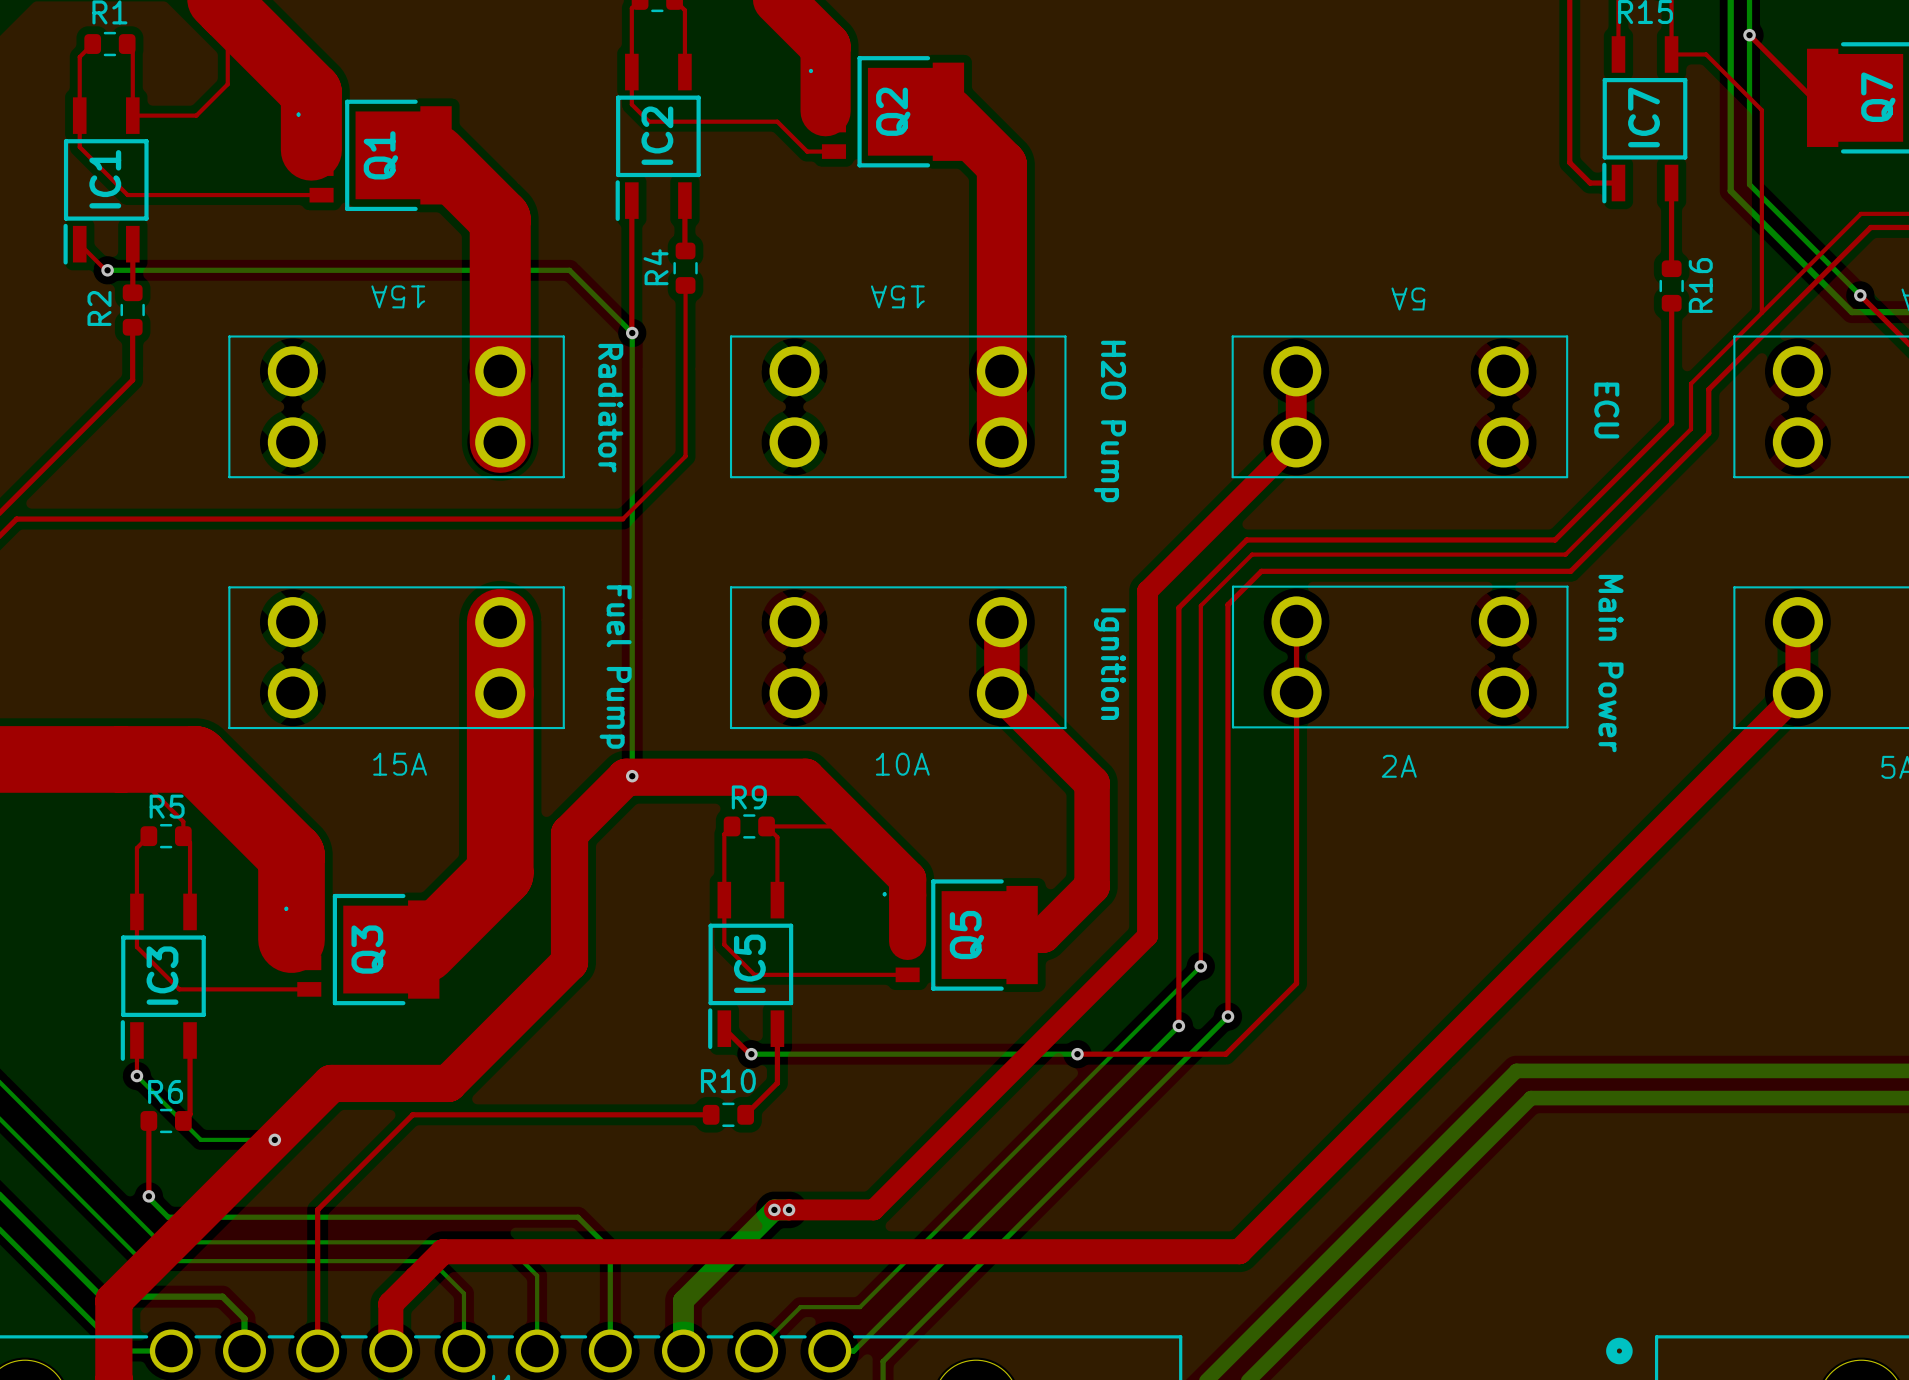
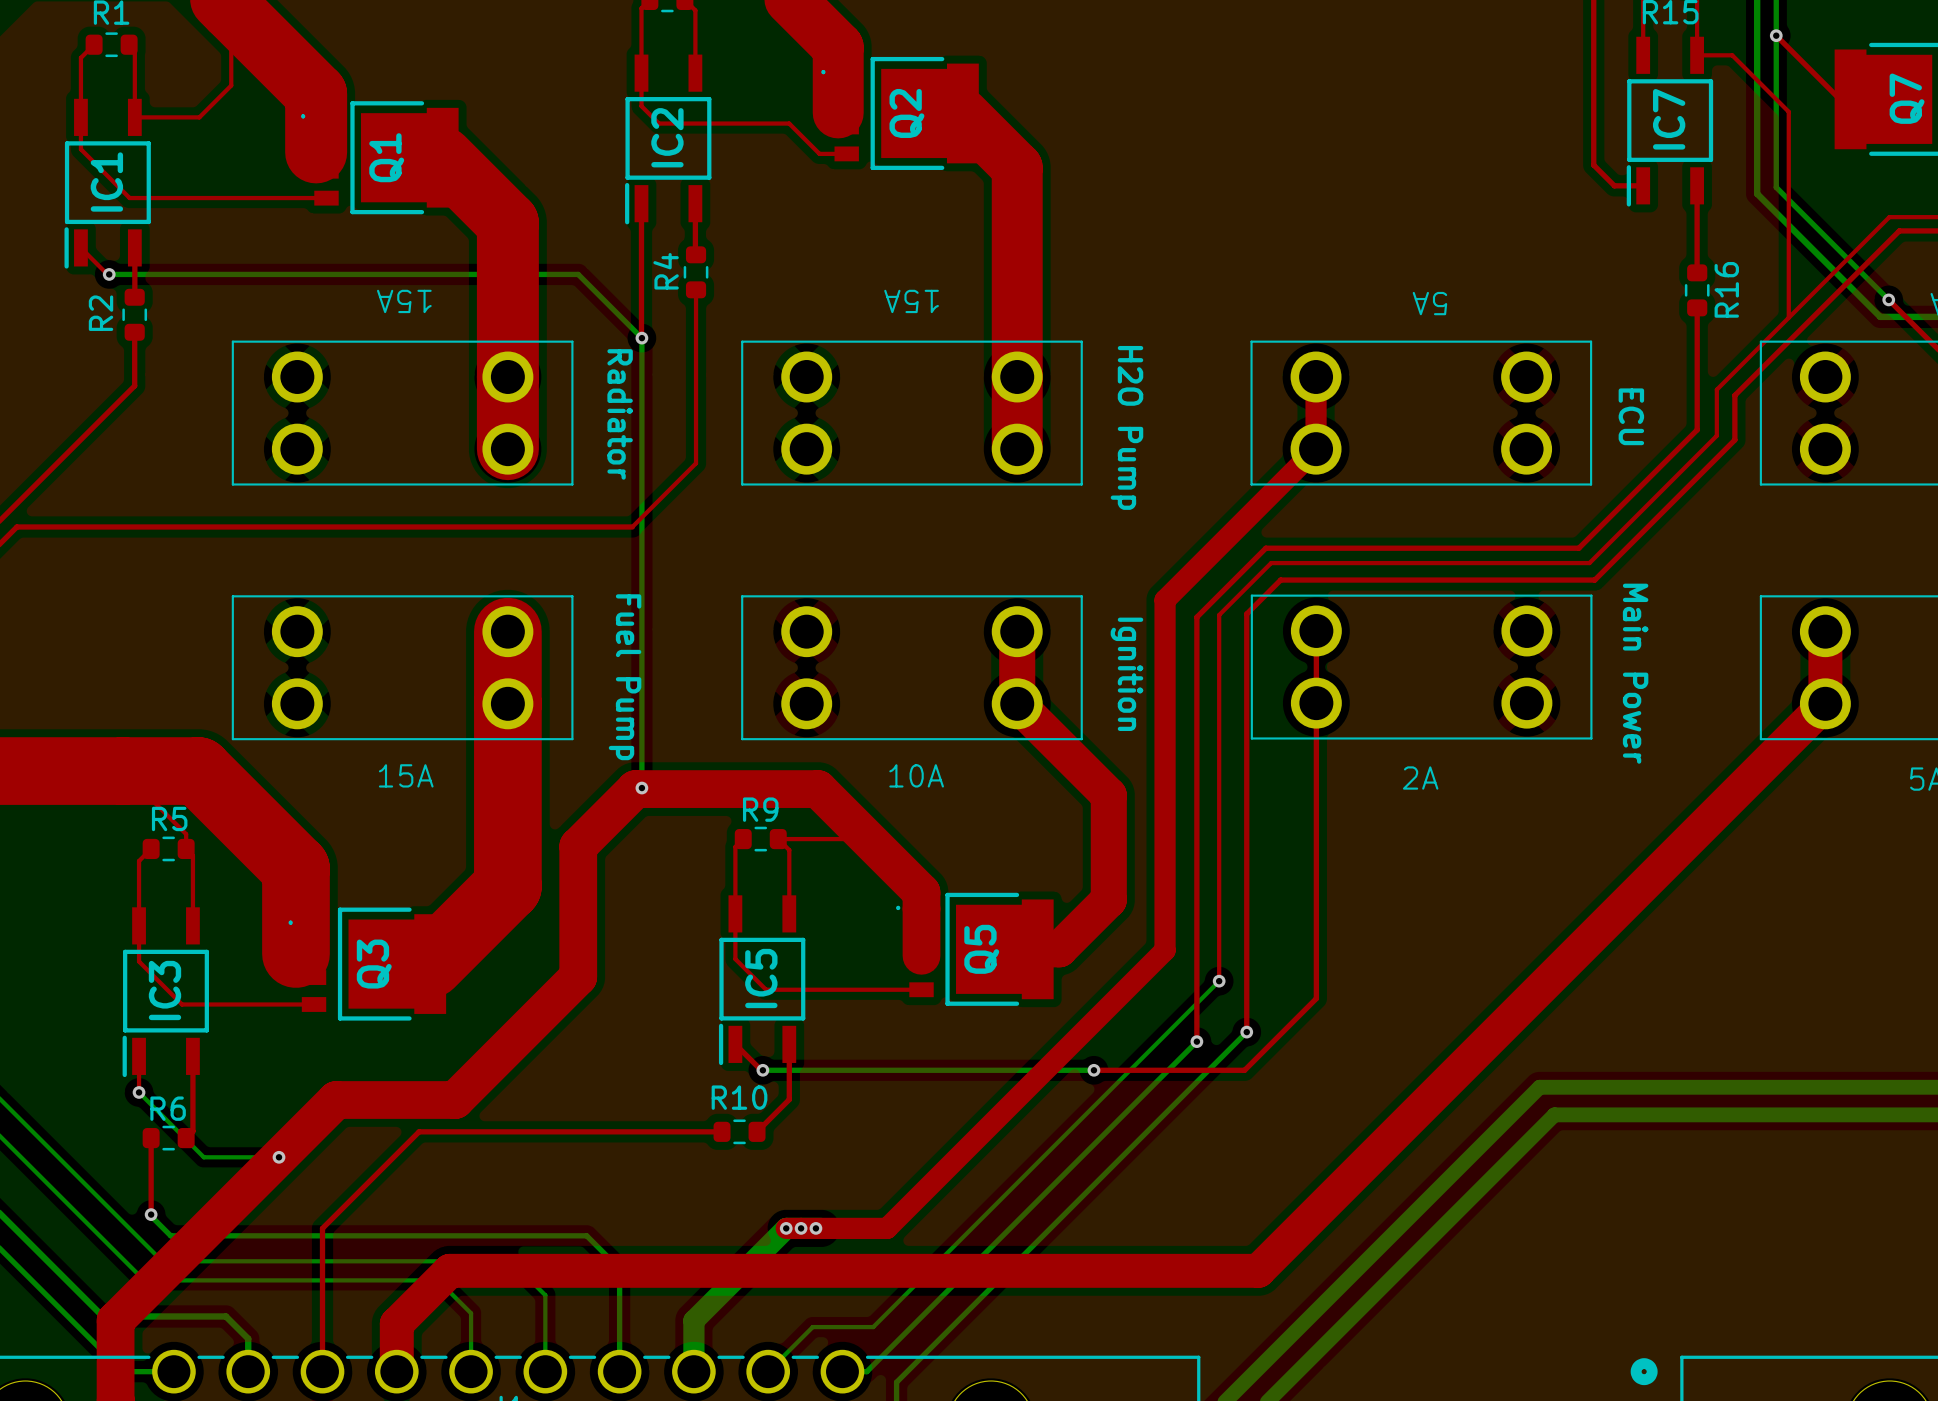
top track width: thin (1797, 622) (1797, 693) (1239, 1251) (443, 1251) (390, 1303) (390, 1351) -> thick (1825, 631) (1825, 703) (1258, 1270) (449, 1270) (396, 1323) (396, 1371)
via: none -> (815, 1228)

